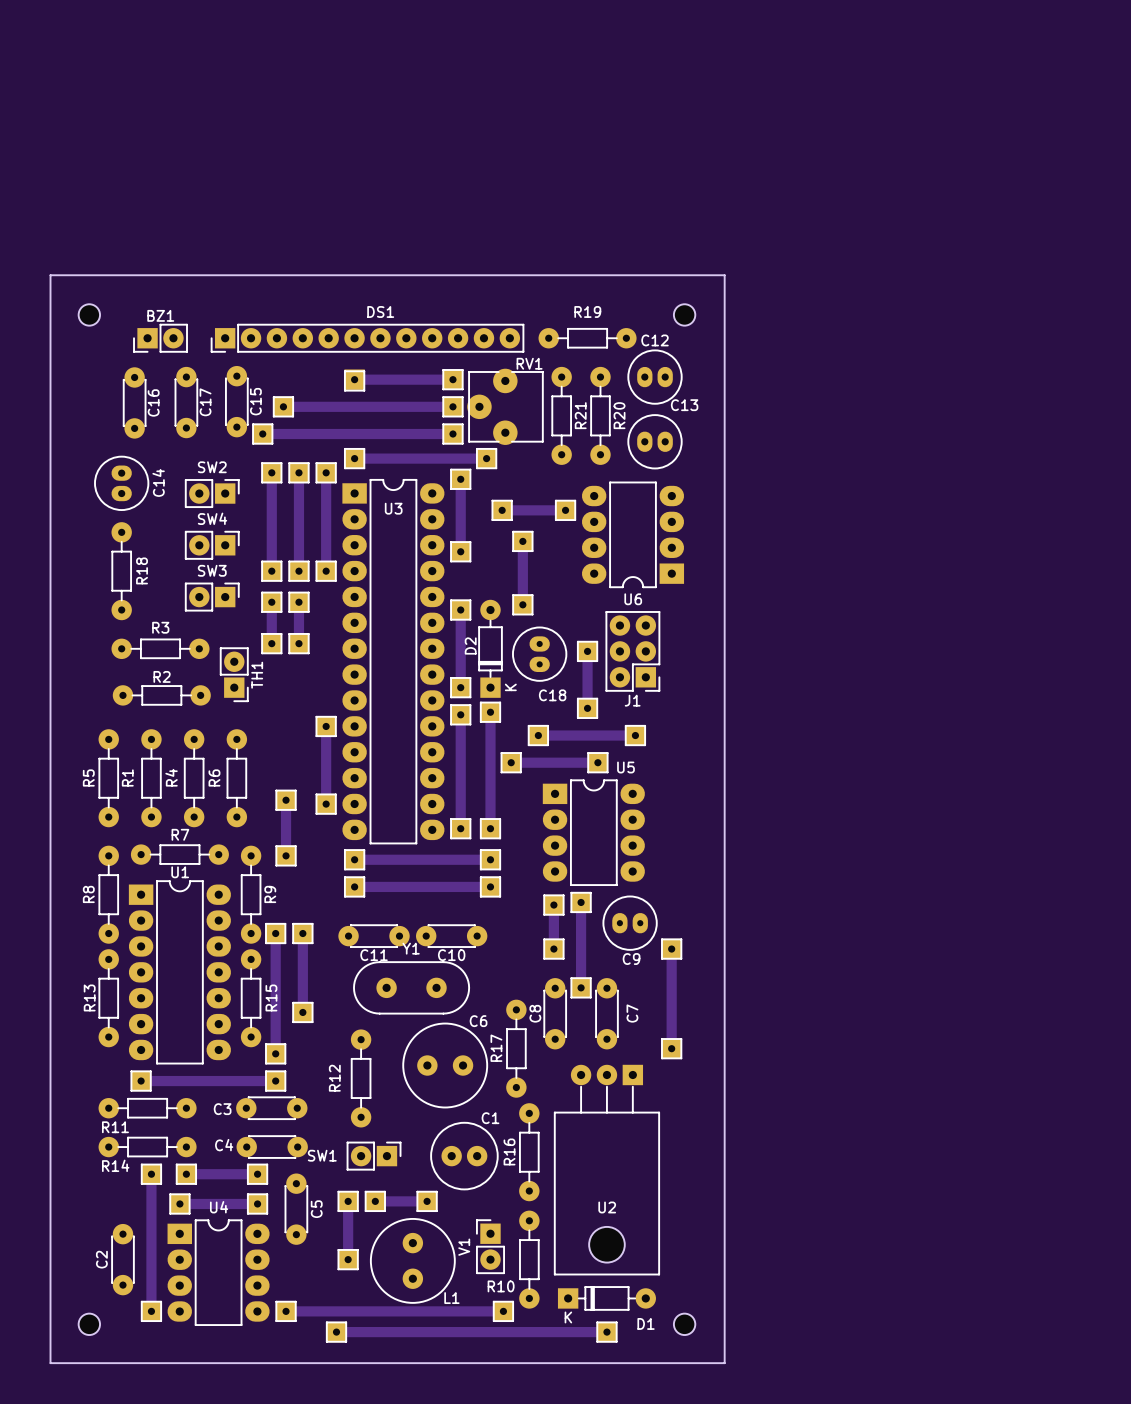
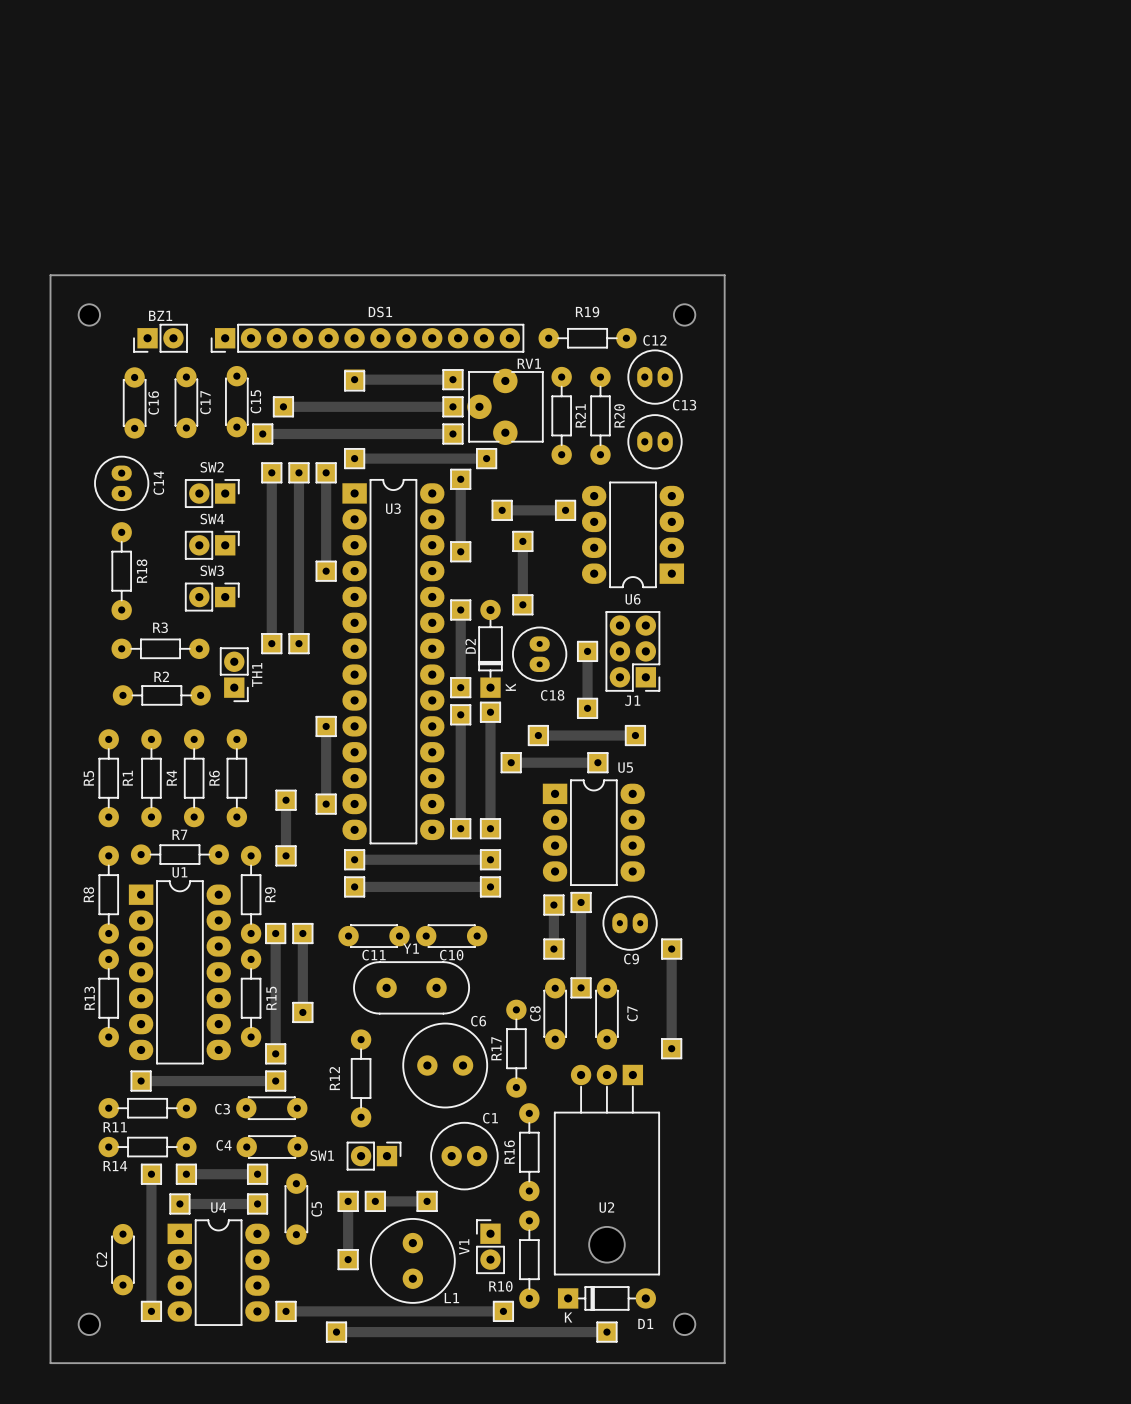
track: none -> (271, 571) (271, 602)
part: (271, 571) -> none
track: none -> (298, 571) (298, 602)
part: (298, 571) -> none
part: (271, 602) -> none
part: (298, 602) -> none

